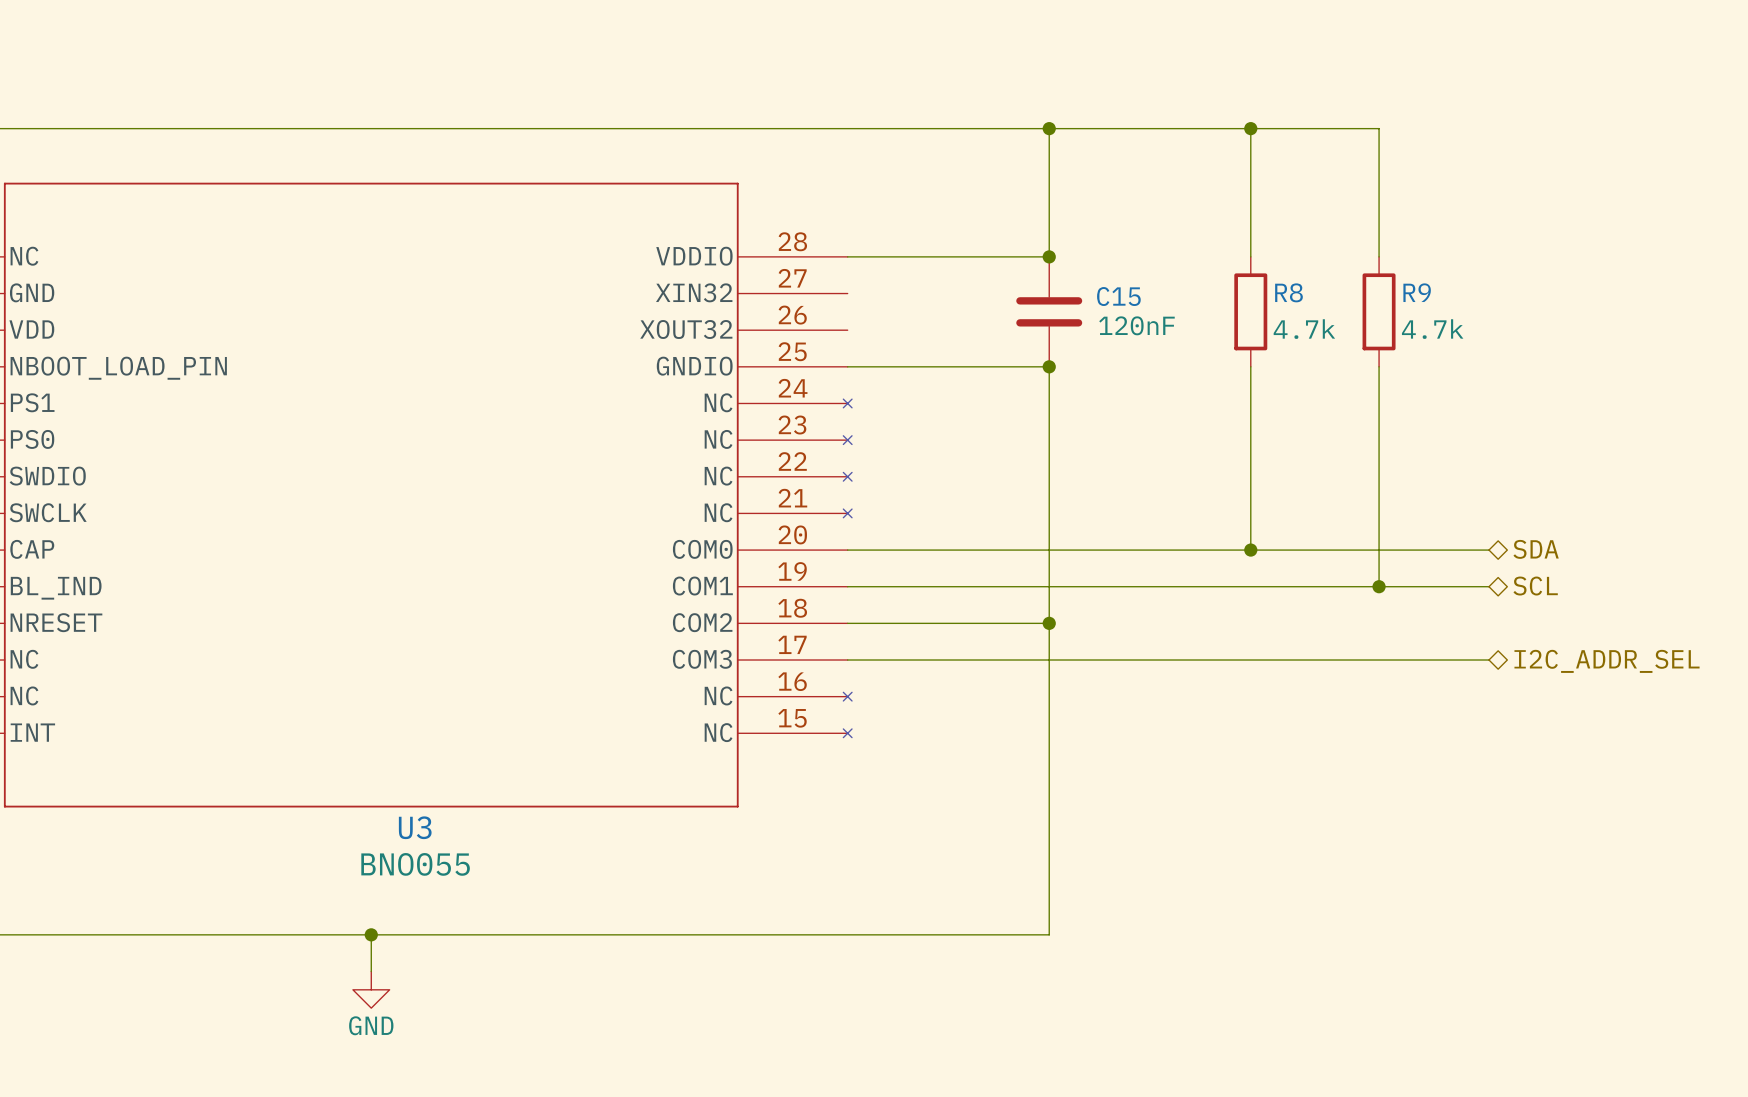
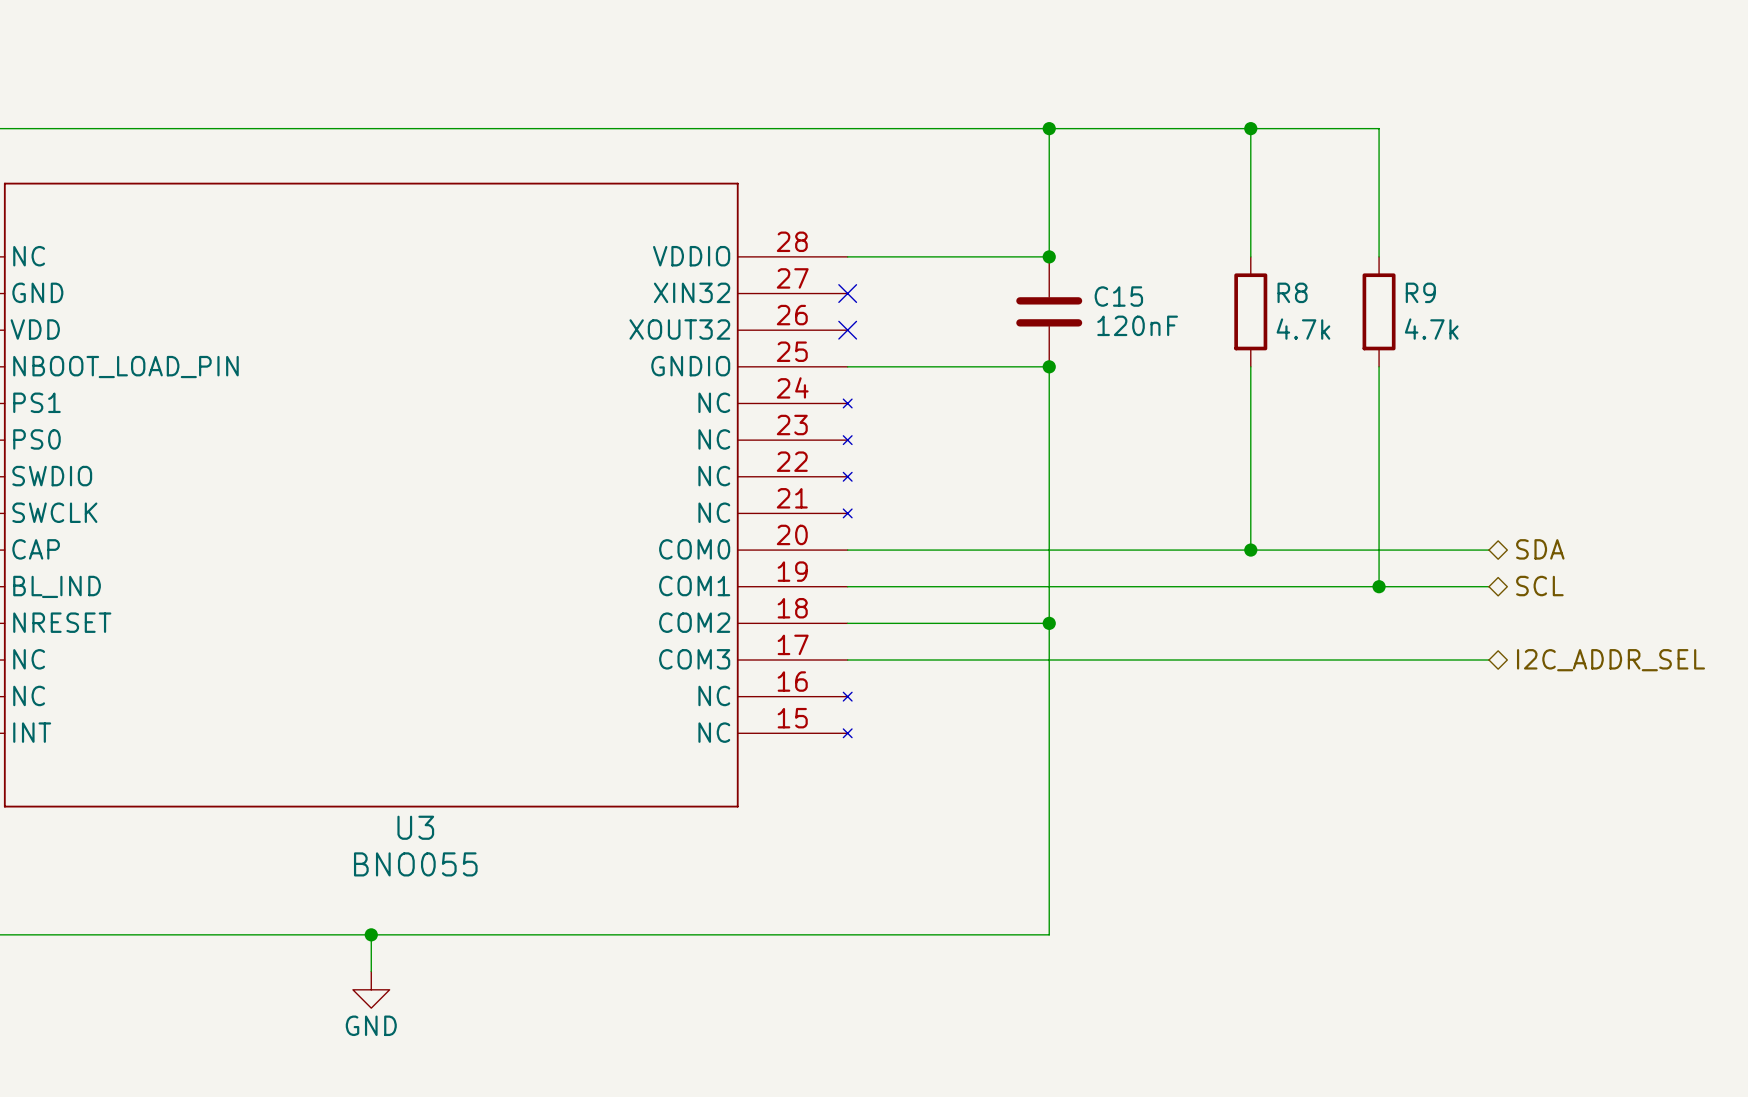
no-connect mark: none -> (847, 293)
no-connect mark: none -> (847, 330)

